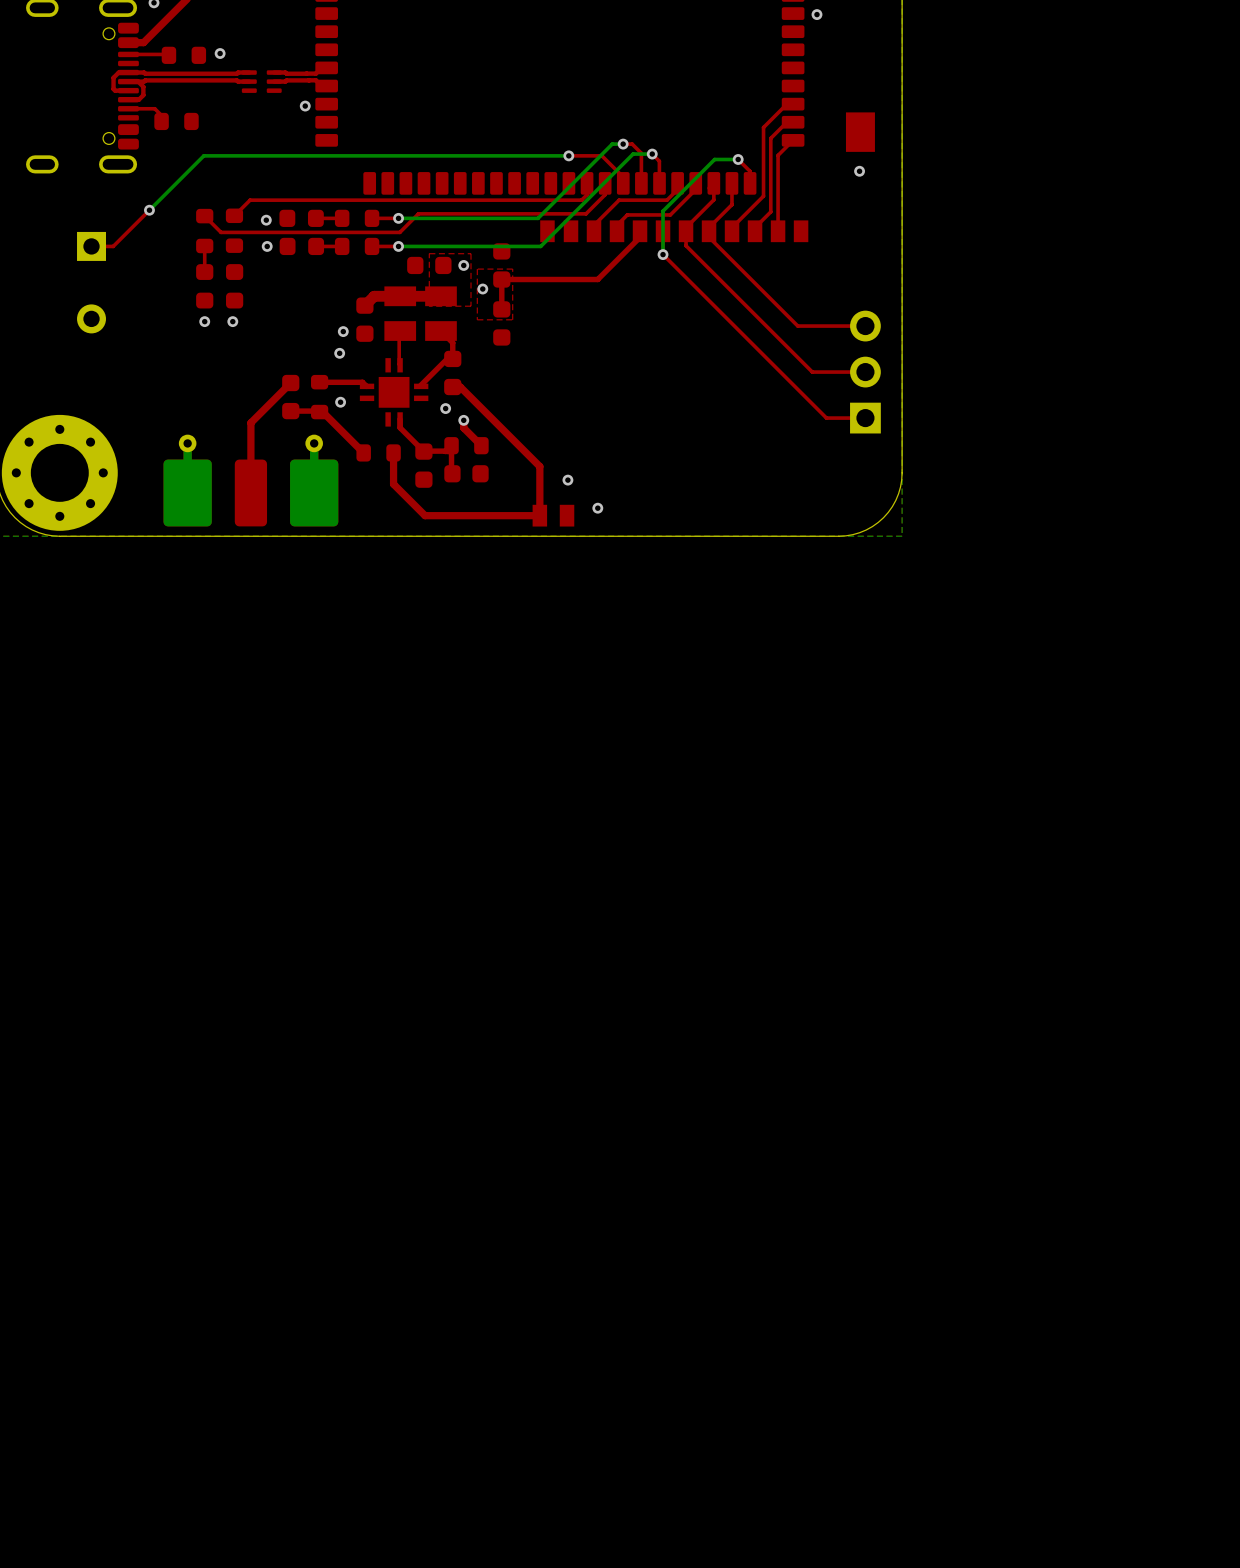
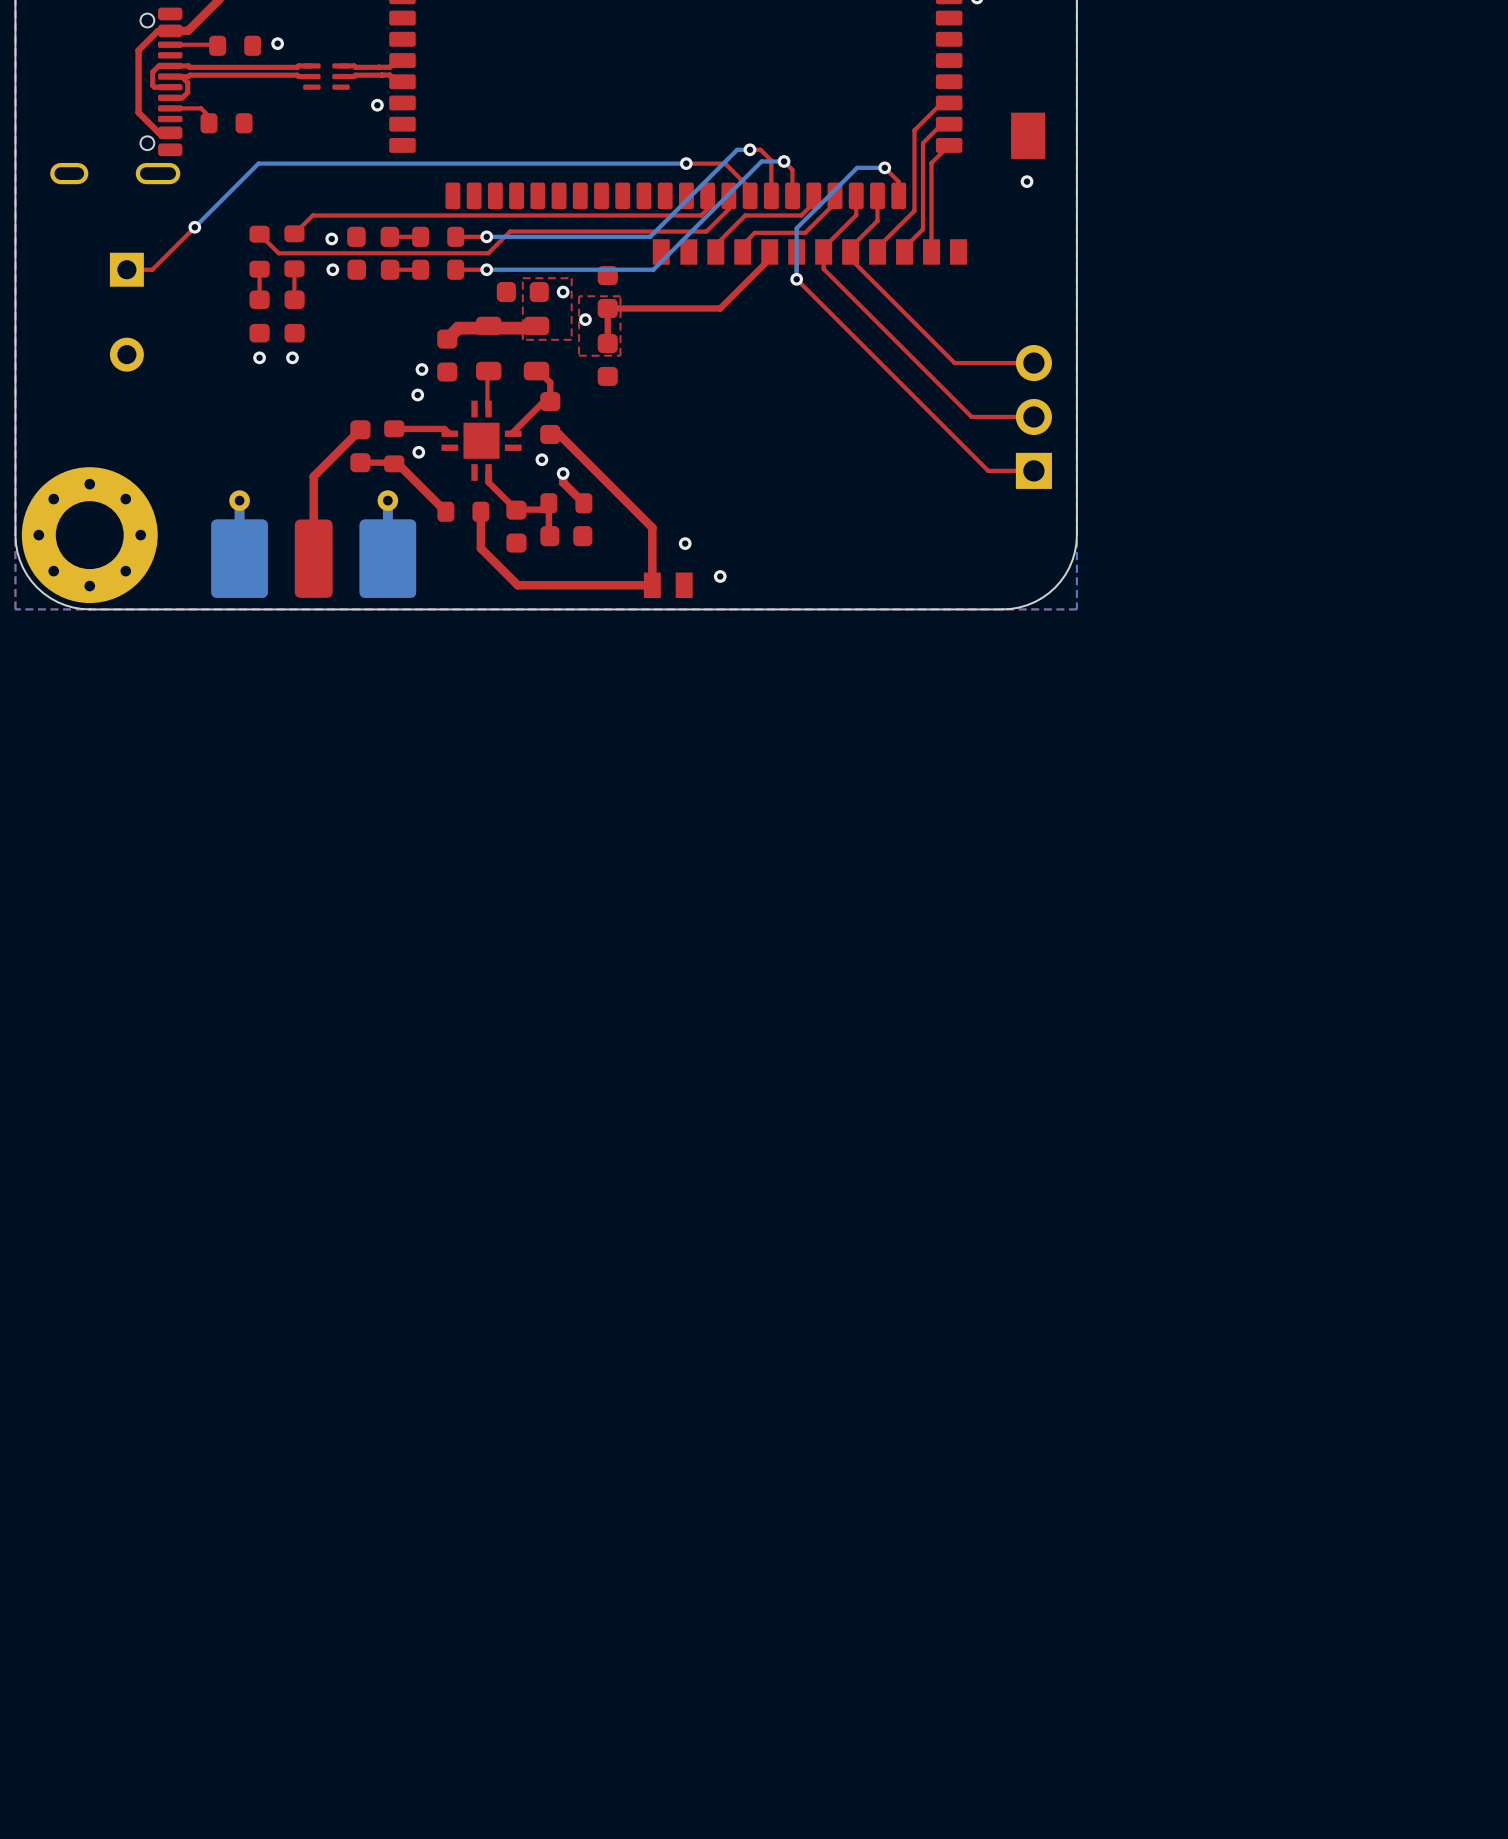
top track: none -> (170, 30) (158, 30) (138, 50) (138, 112) (158, 132) (170, 132)
top track: none -> (294, 268) (294, 299)
part footprint: [384, 286, 417, 341] -> [475, 316, 502, 381]
part footprint: [425, 286, 457, 341] -> [523, 316, 550, 381]

